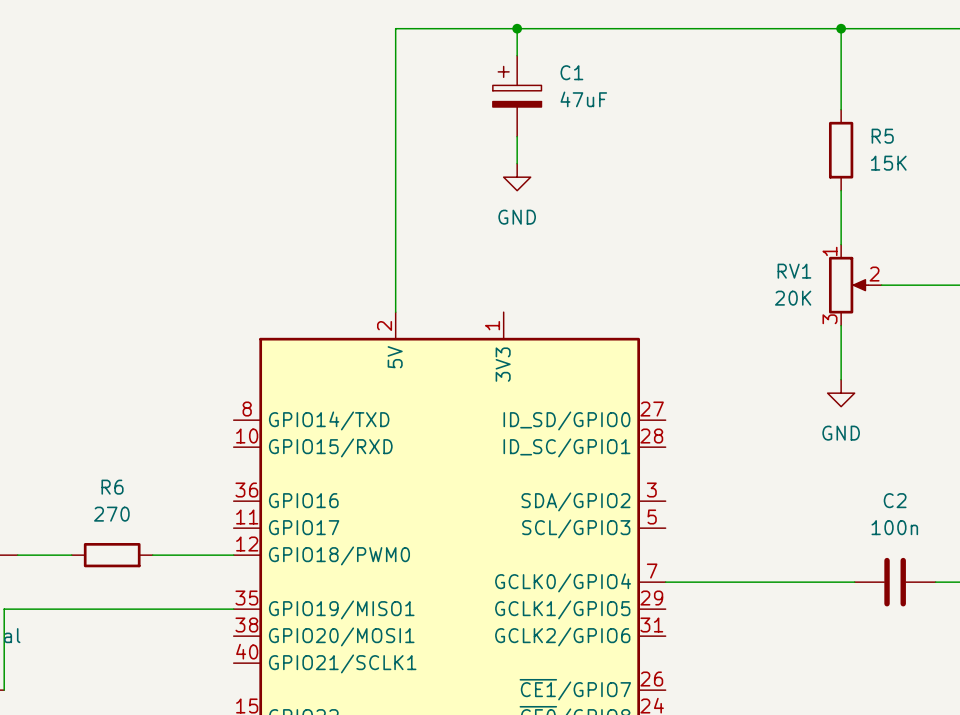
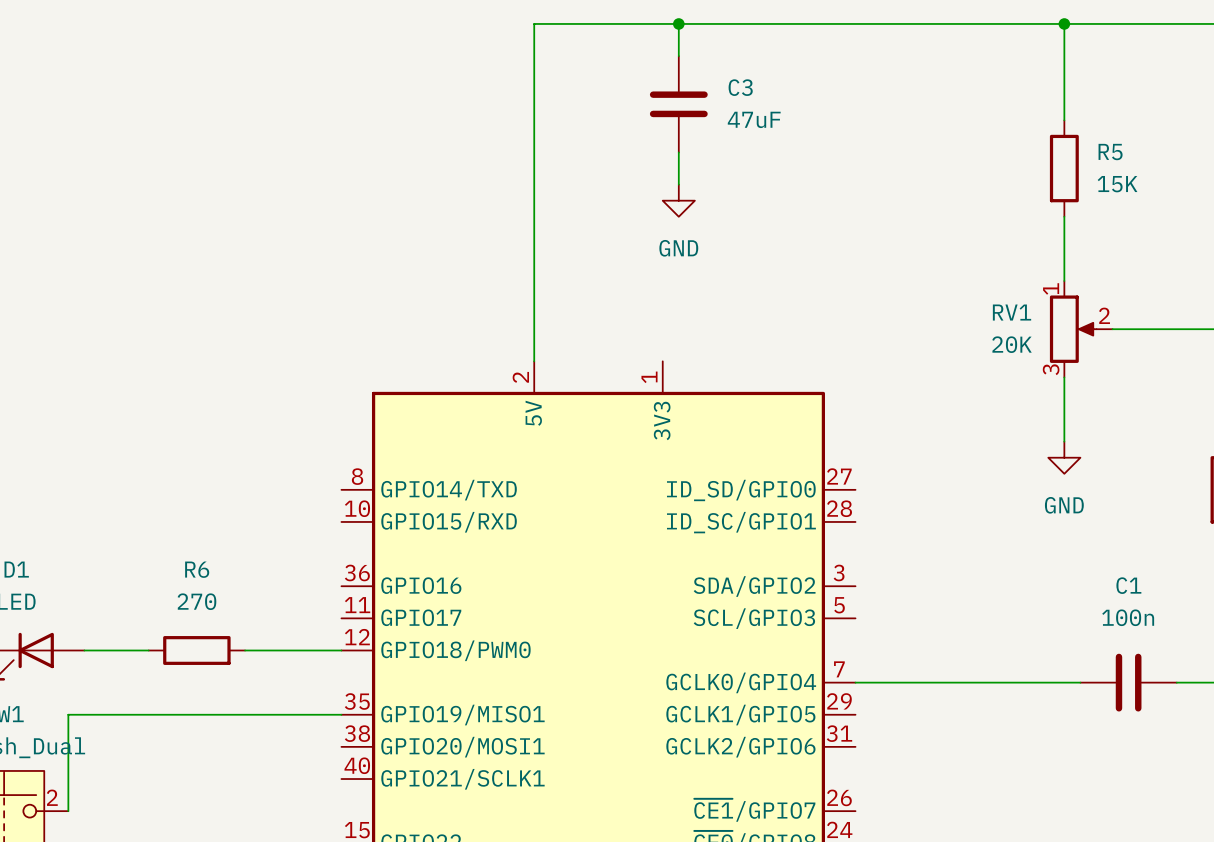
C1: 47uF (517, 96) -> none
C3: none -> 47uF (678, 104)
C2 name: C2 (895, 500) -> C1 (1128, 585)

